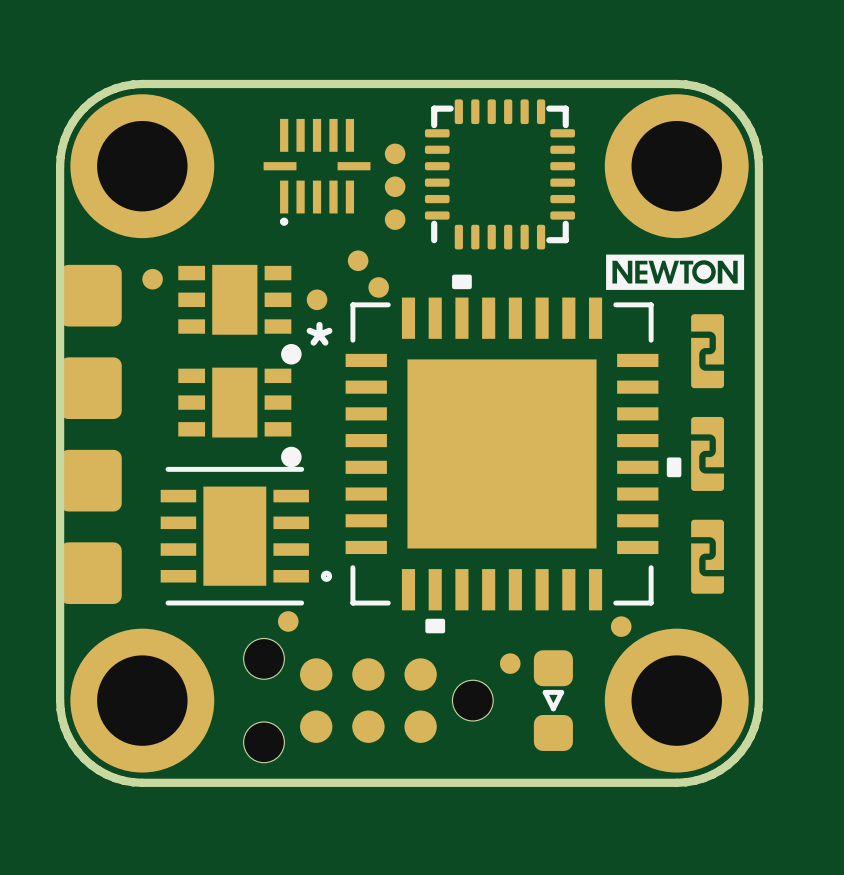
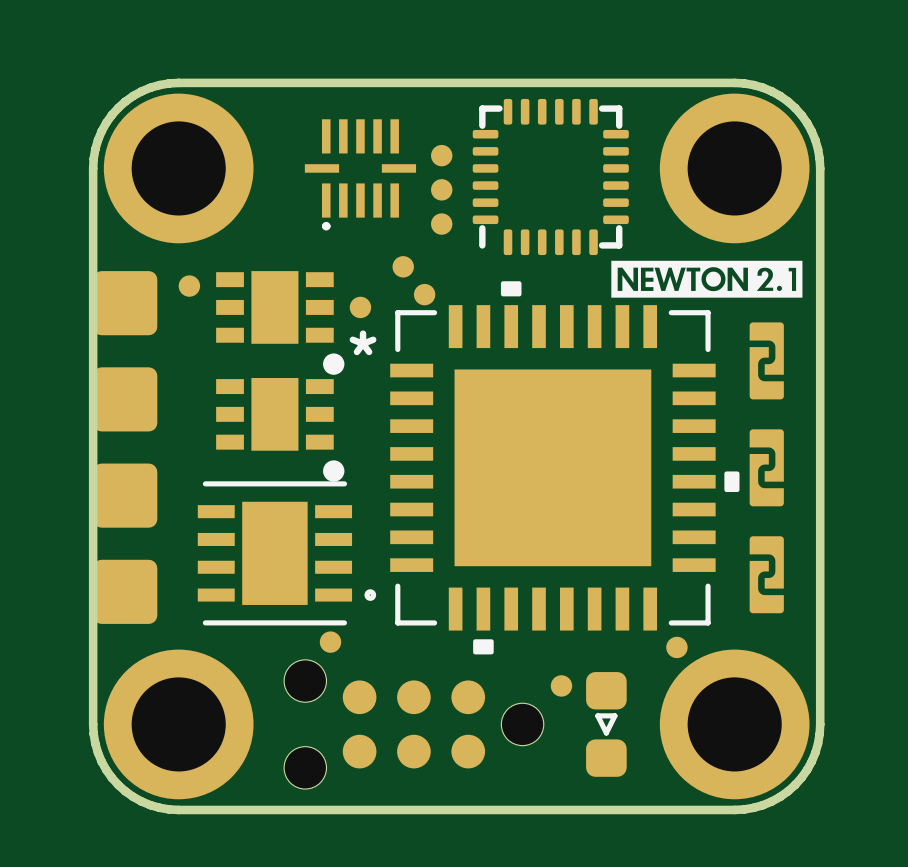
drawing shape: [606, 254, 745, 290] -> [611, 260, 803, 298]
drawing: [696, 264, 712, 280] -> none

